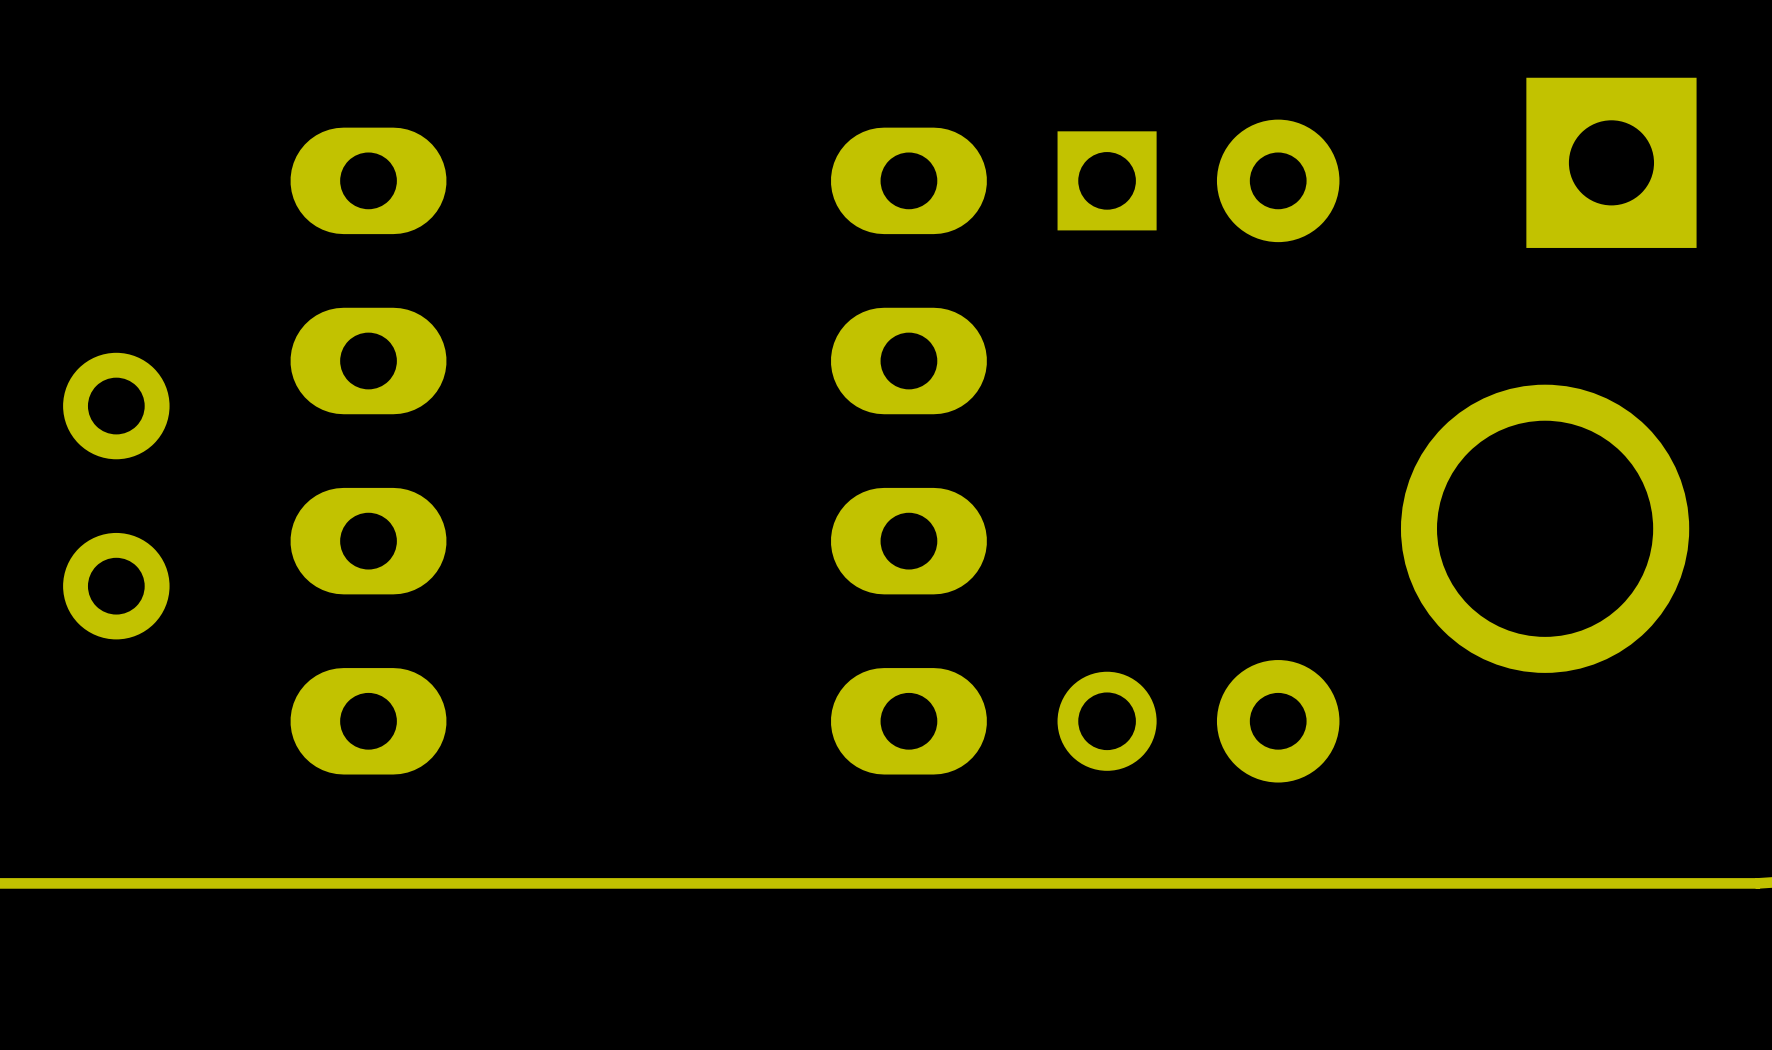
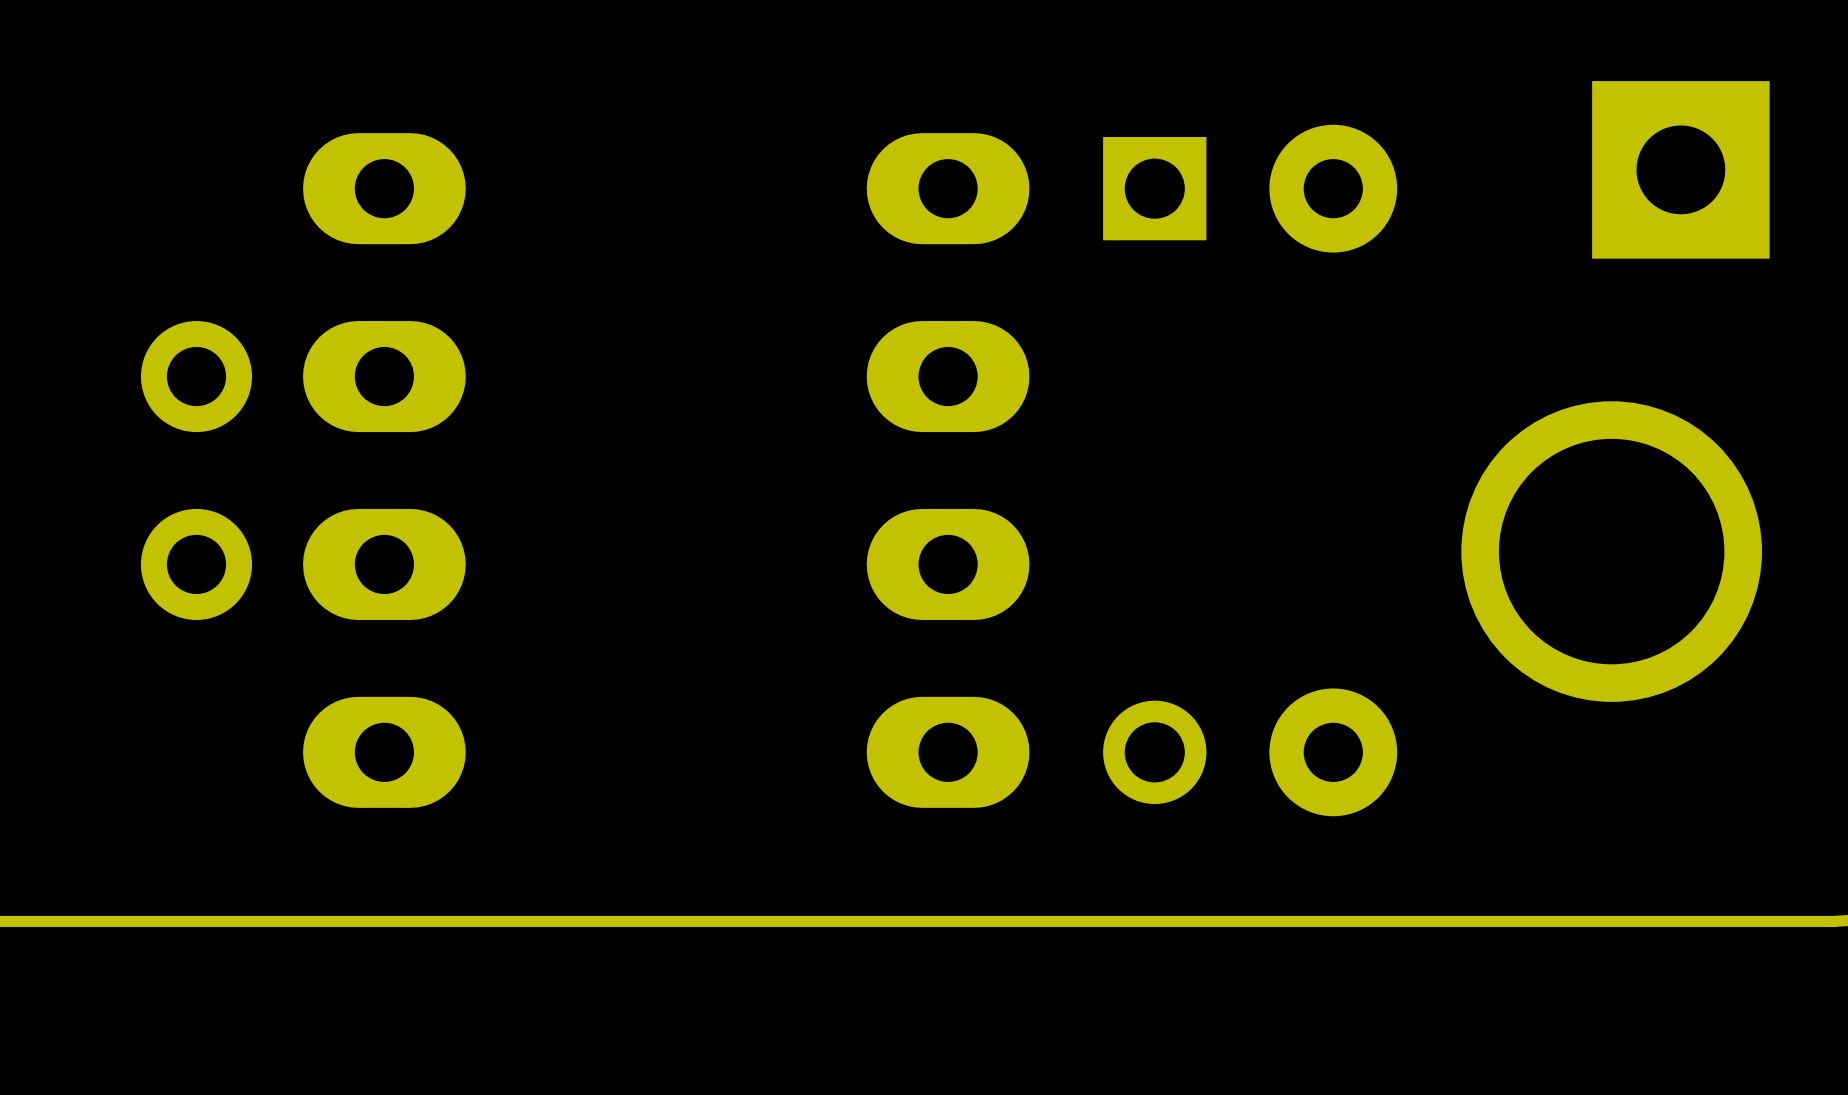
part position: (116, 496) -> (196, 470)

